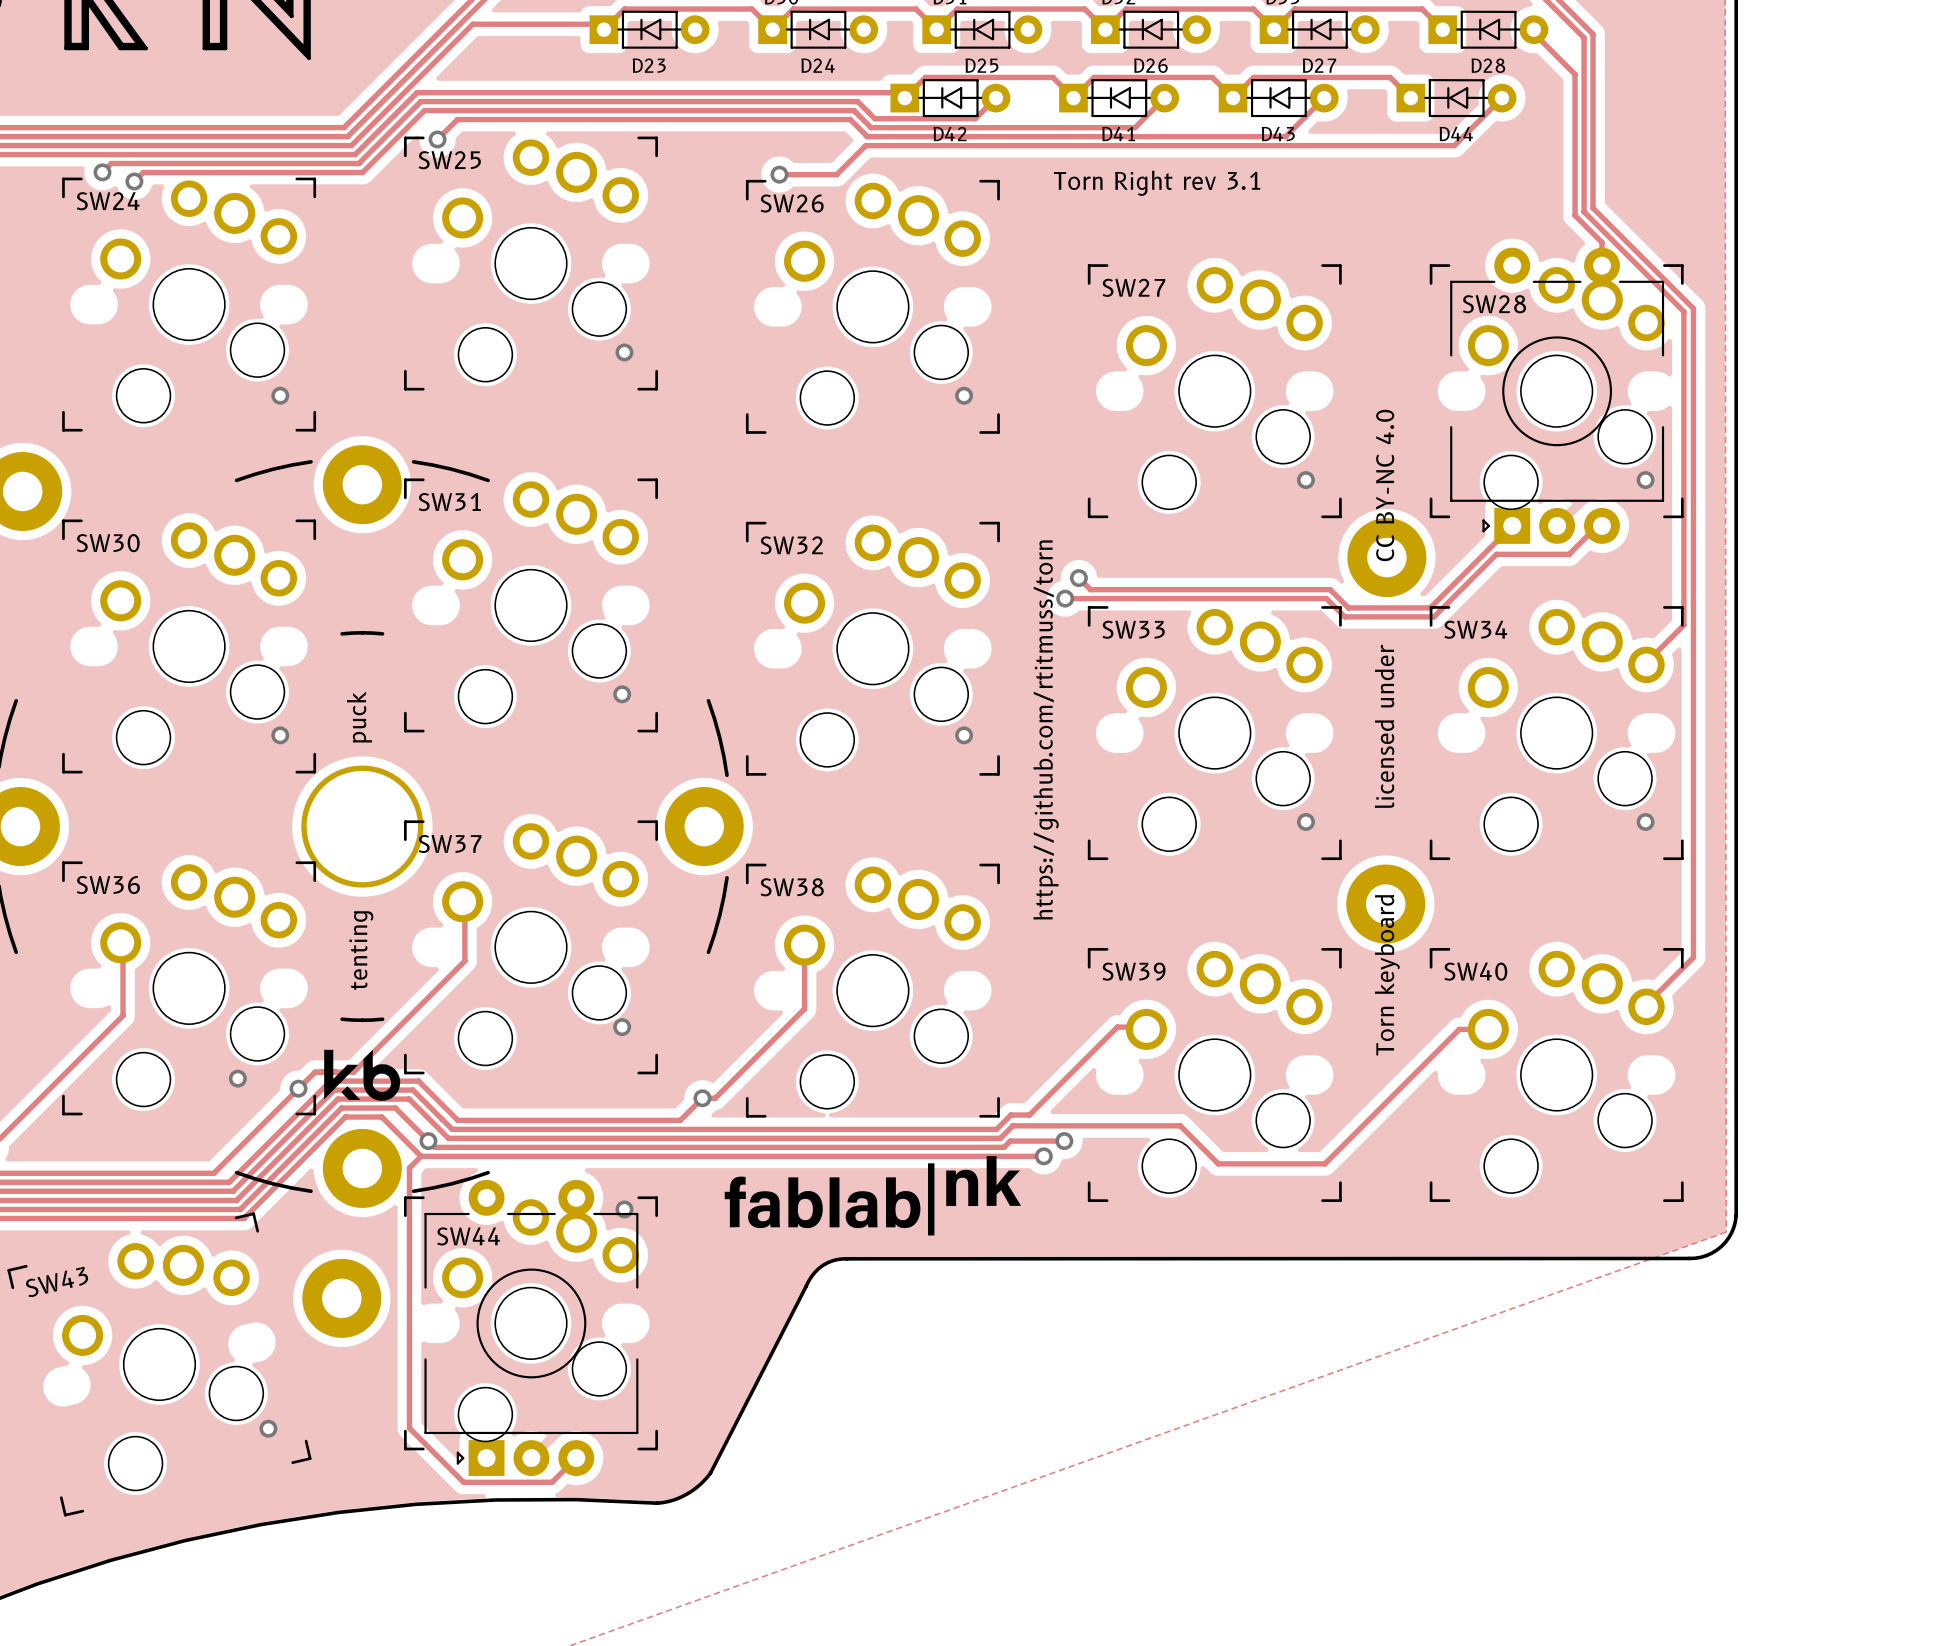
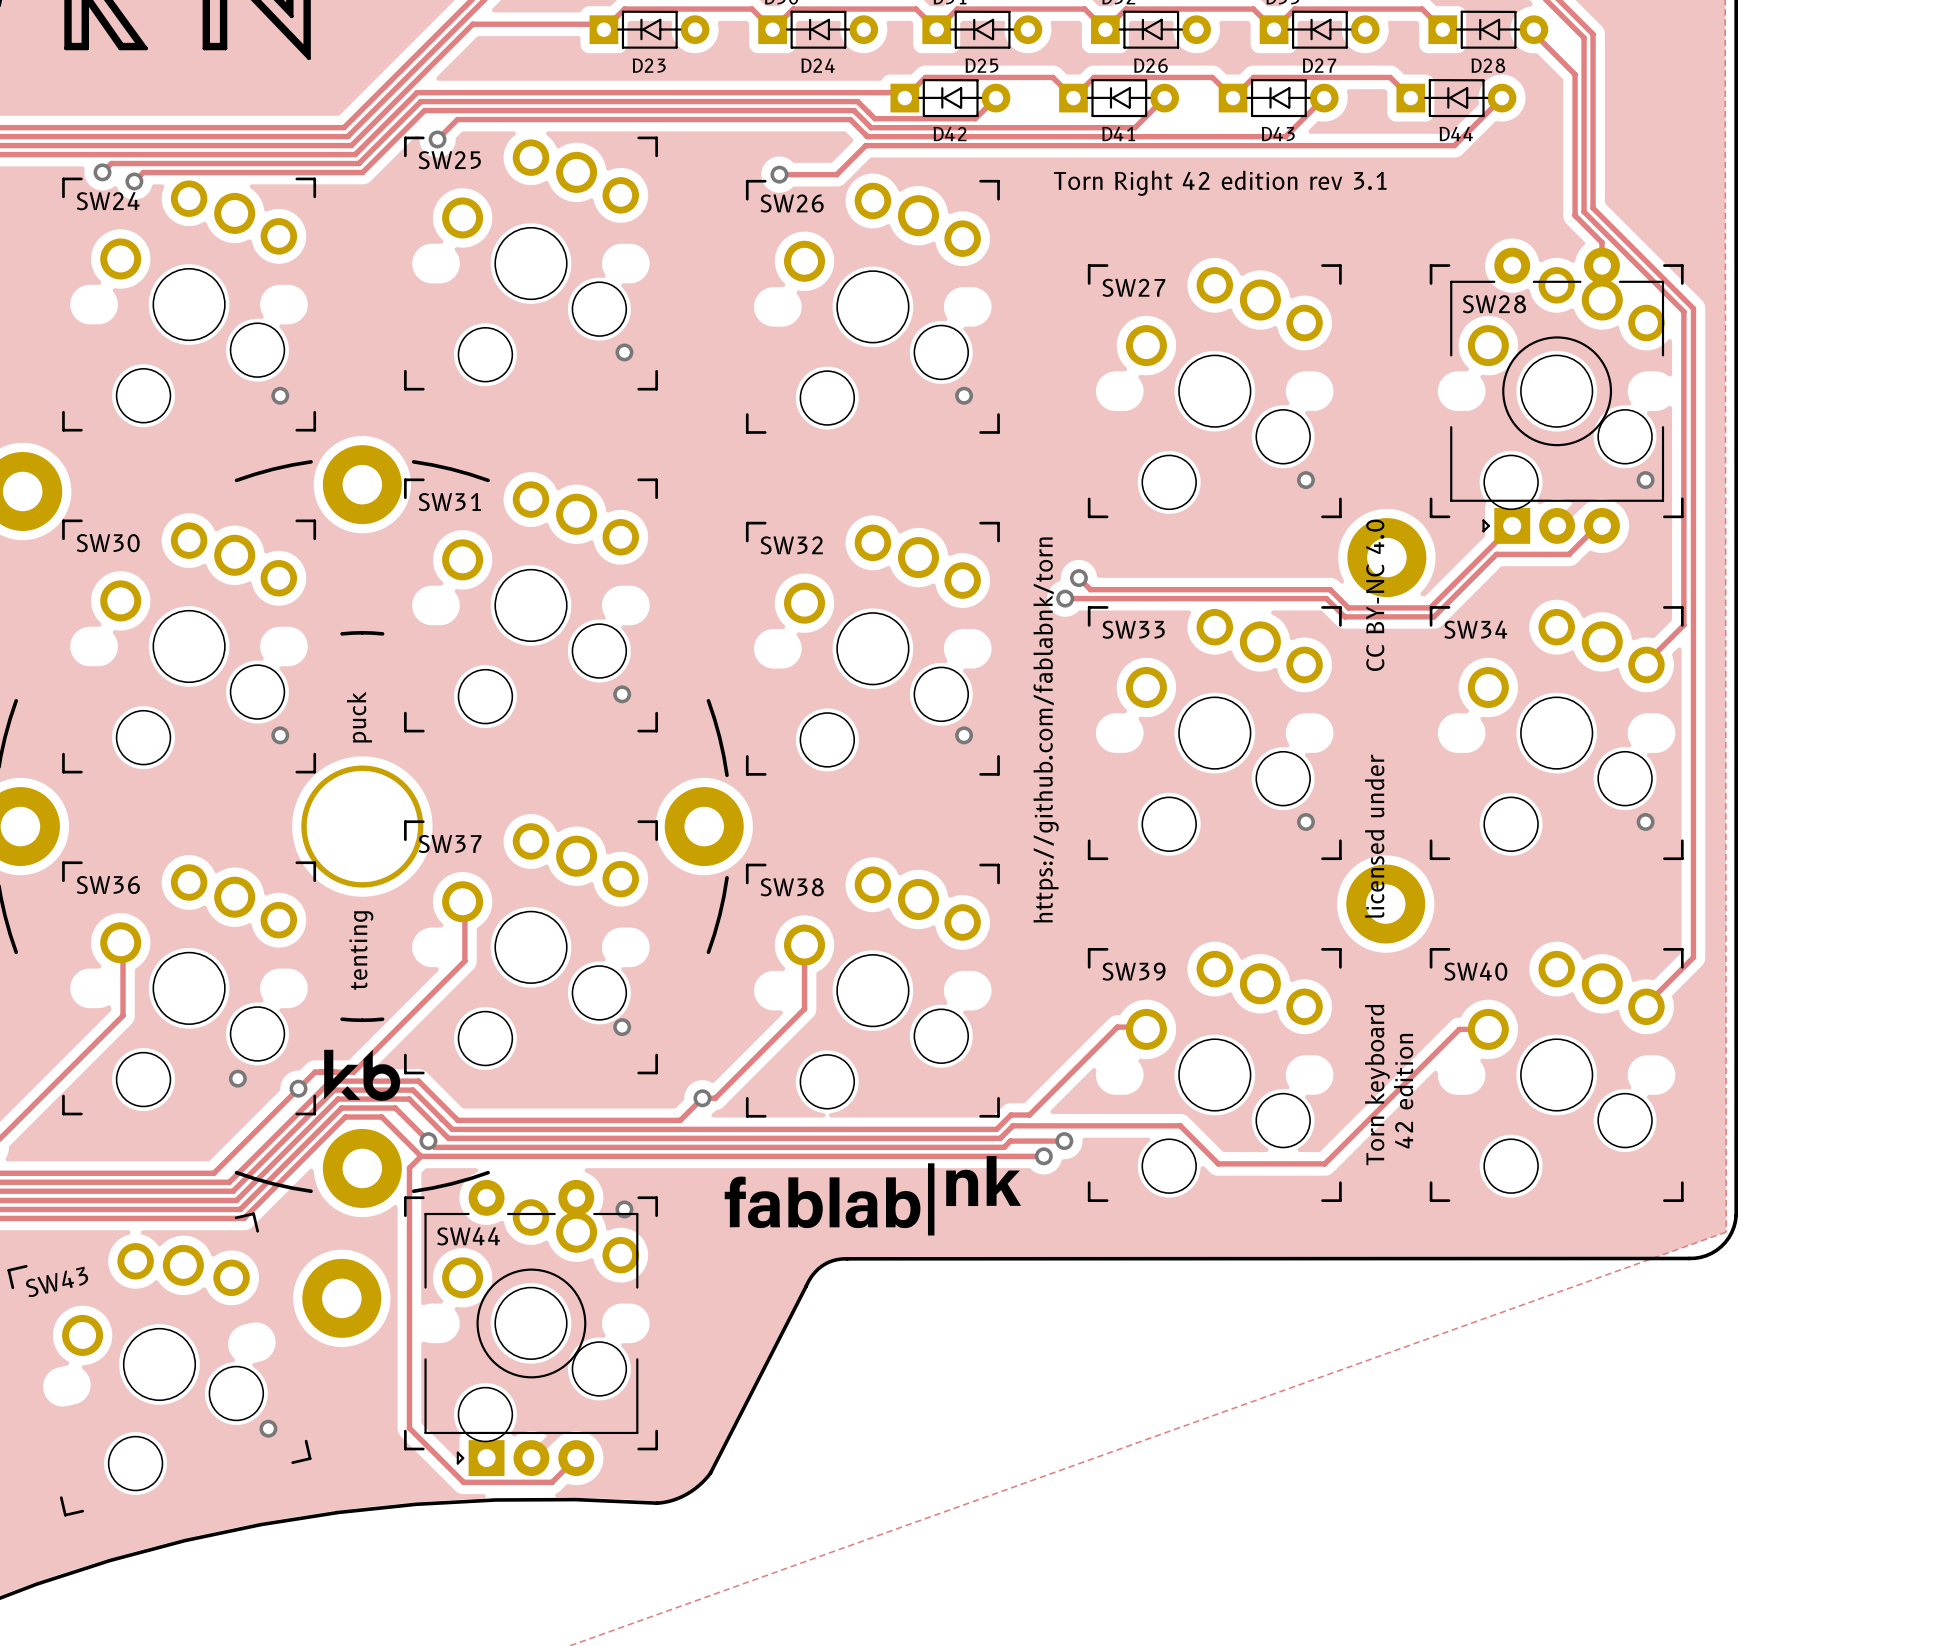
text: Torn Right rev 3.1 (1157, 183) -> Torn Right 42 edition rev 3.1 (1220, 183)
text: https://github.com/rtitmuss/torn (1046, 730) -> https://github.com/fablabnk/torn (1046, 730)
text position: Torn keyboard licensed under CC BY-NC 4.0 (1387, 732) -> Torn keyboard licensed under CC BY-NC 4.0 (1377, 842)
text: none -> 42 edition (1403, 1091)

